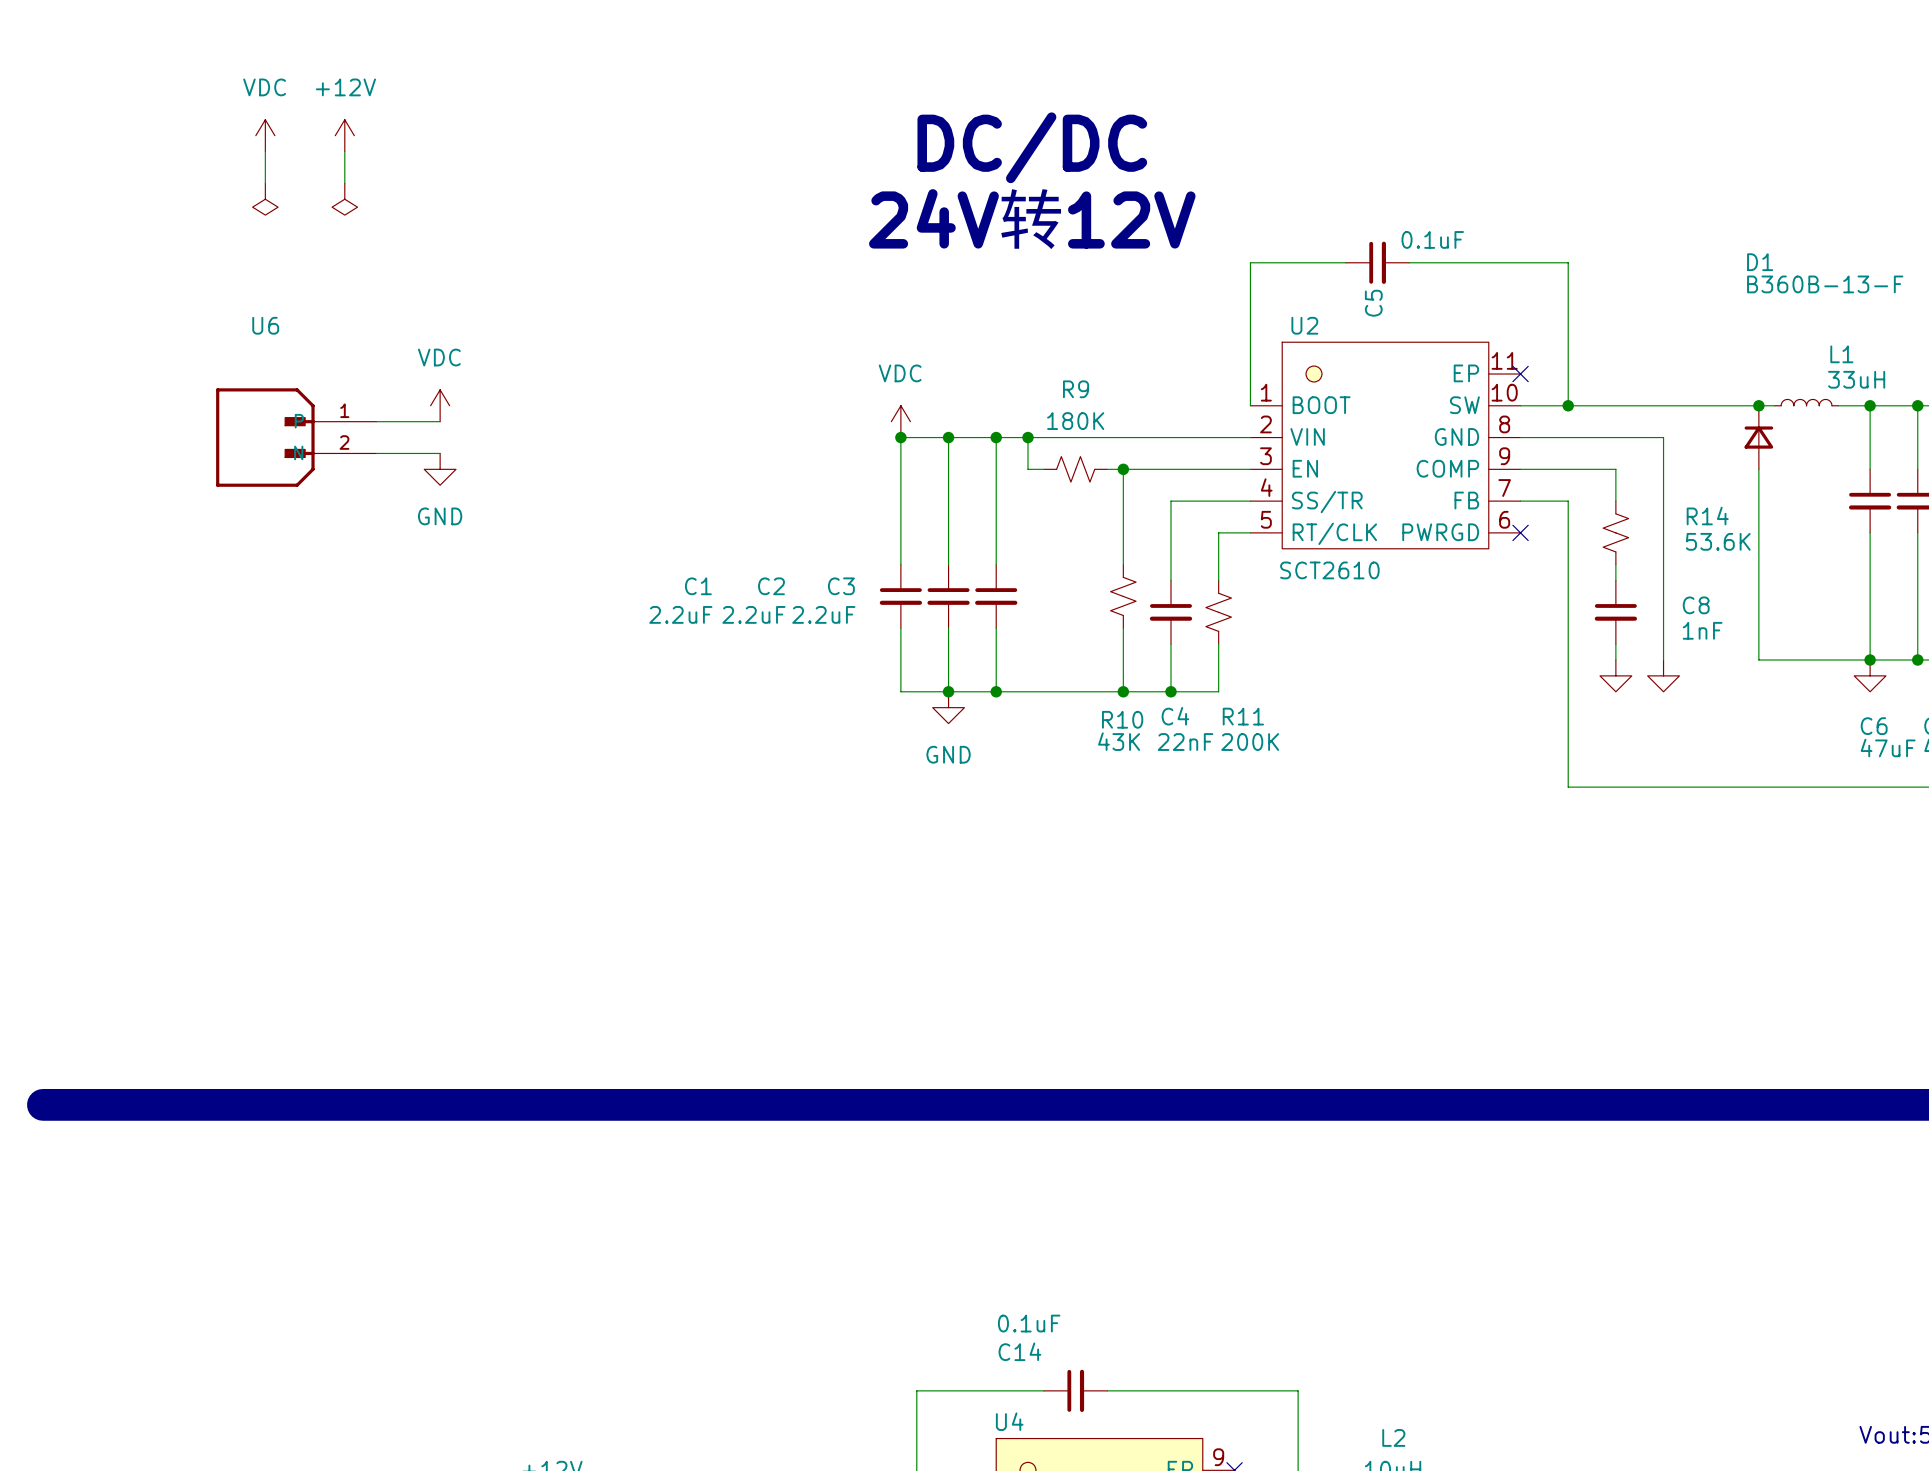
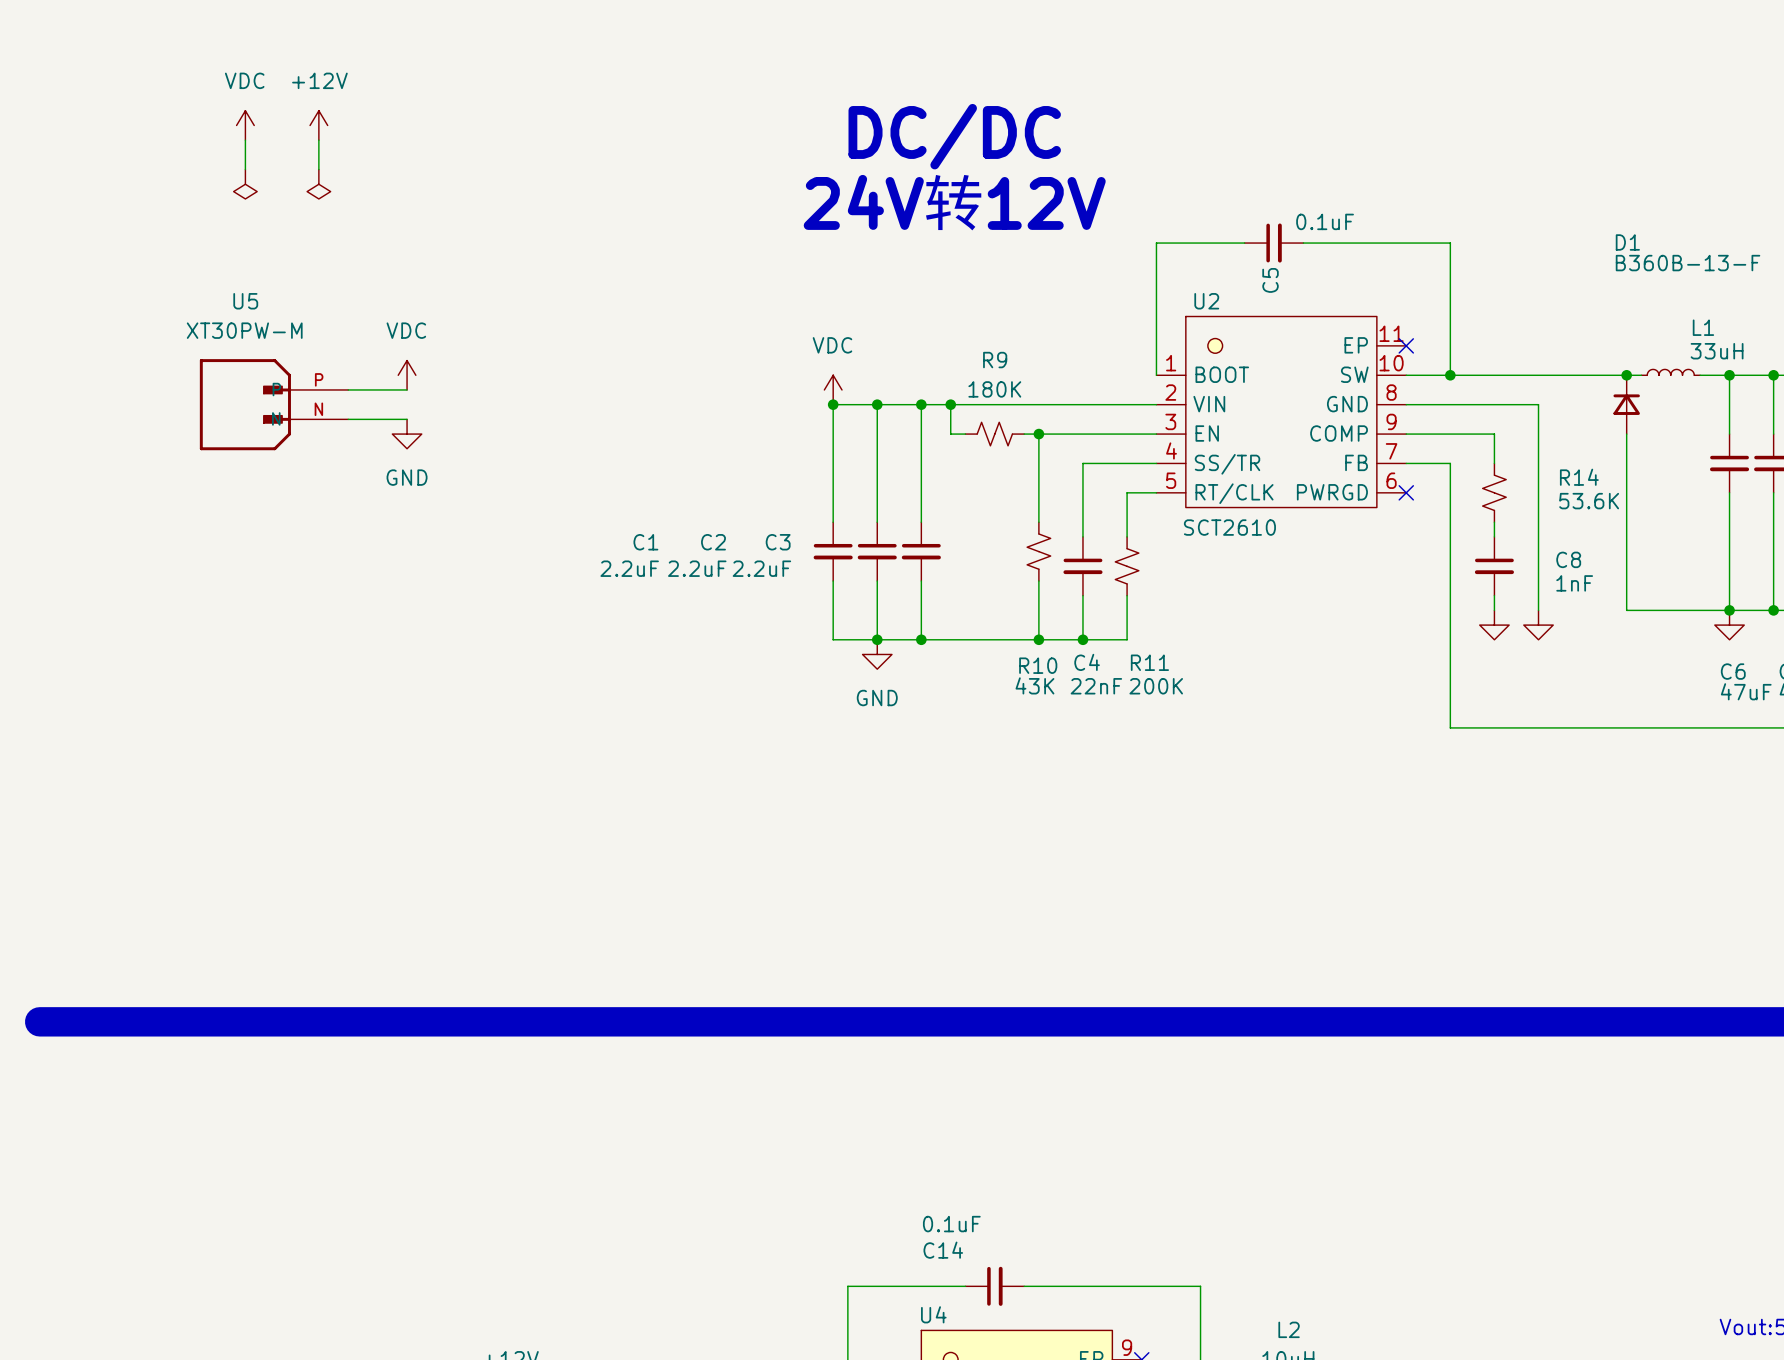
U6 name: U6 (265, 325) -> U5 (245, 301)
U6 value: none -> XT30PW-M (244, 330)
U6 pin number: 1 (344, 410) -> P (319, 379)
U6 pin number: 2 (344, 442) -> N (318, 409)

